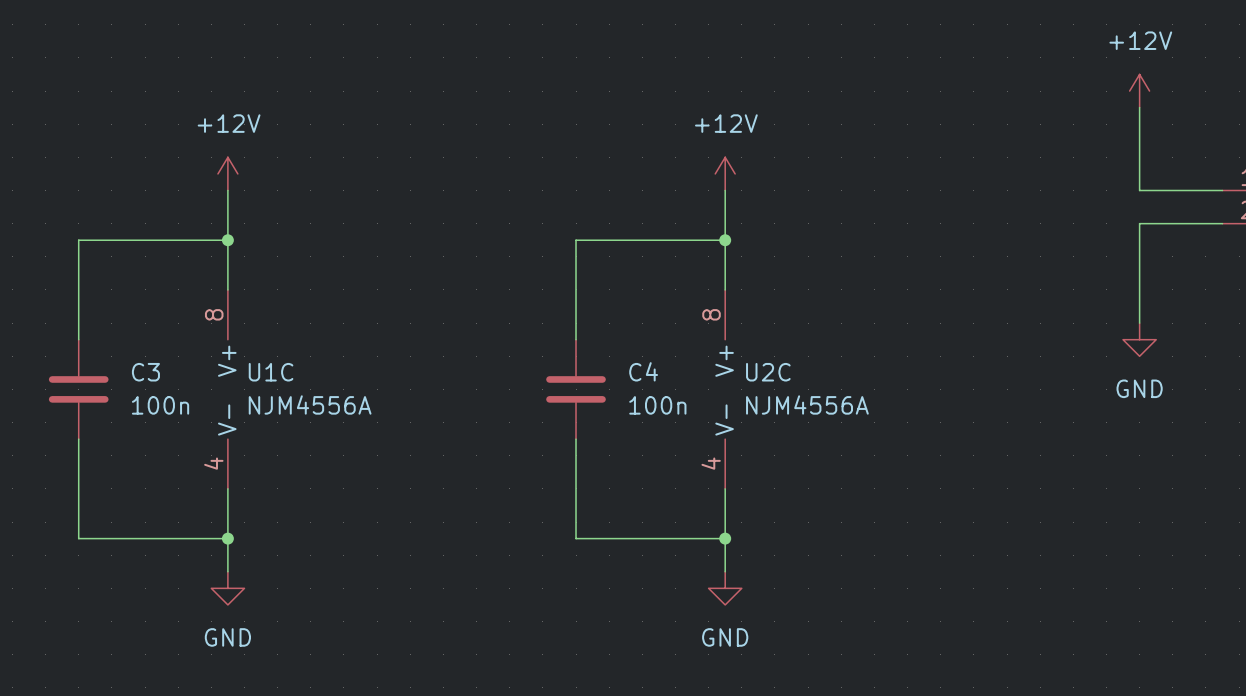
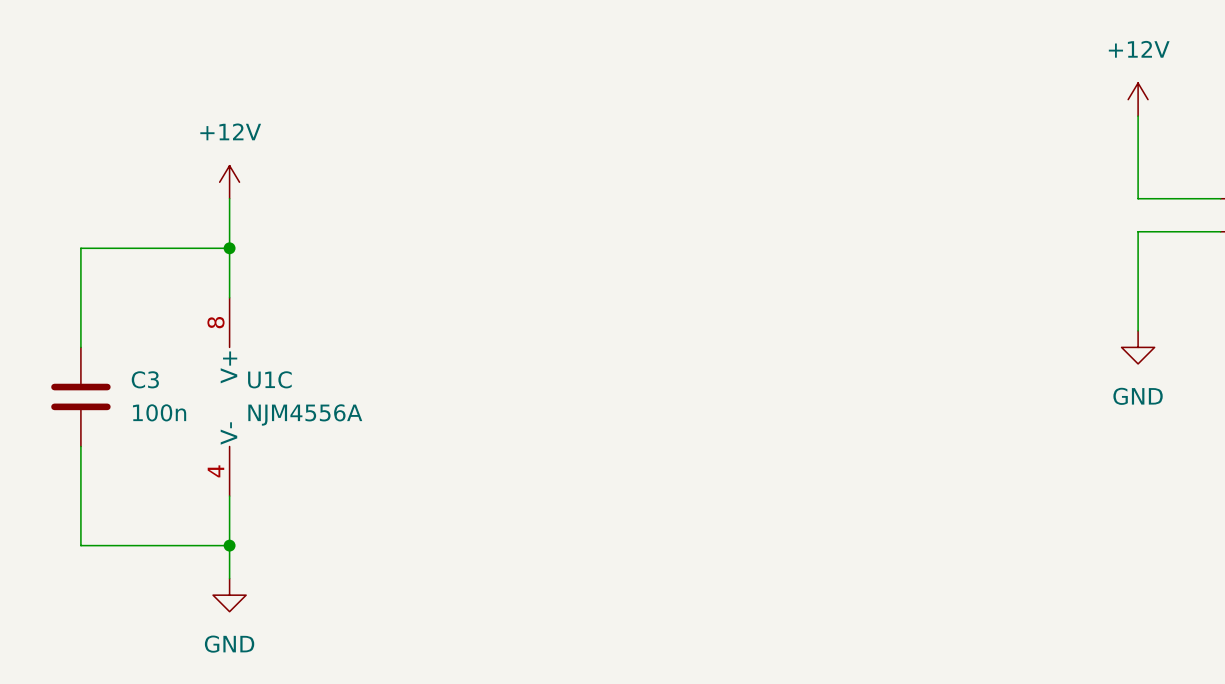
power symbol: +12V (725, 173) -> none
wire: (725, 190) (725, 289) -> none
wire: (725, 240) (576, 240) (576, 339) -> none
junction: (725, 240) -> none
C4: 100n (576, 389) -> none
U2C: NJM4556A (725, 389) -> none
wire: (576, 439) (576, 538) (725, 538) -> none
wire: (725, 488) (725, 571) -> none
junction: (725, 538) -> none
power symbol: GND (725, 588) -> none

